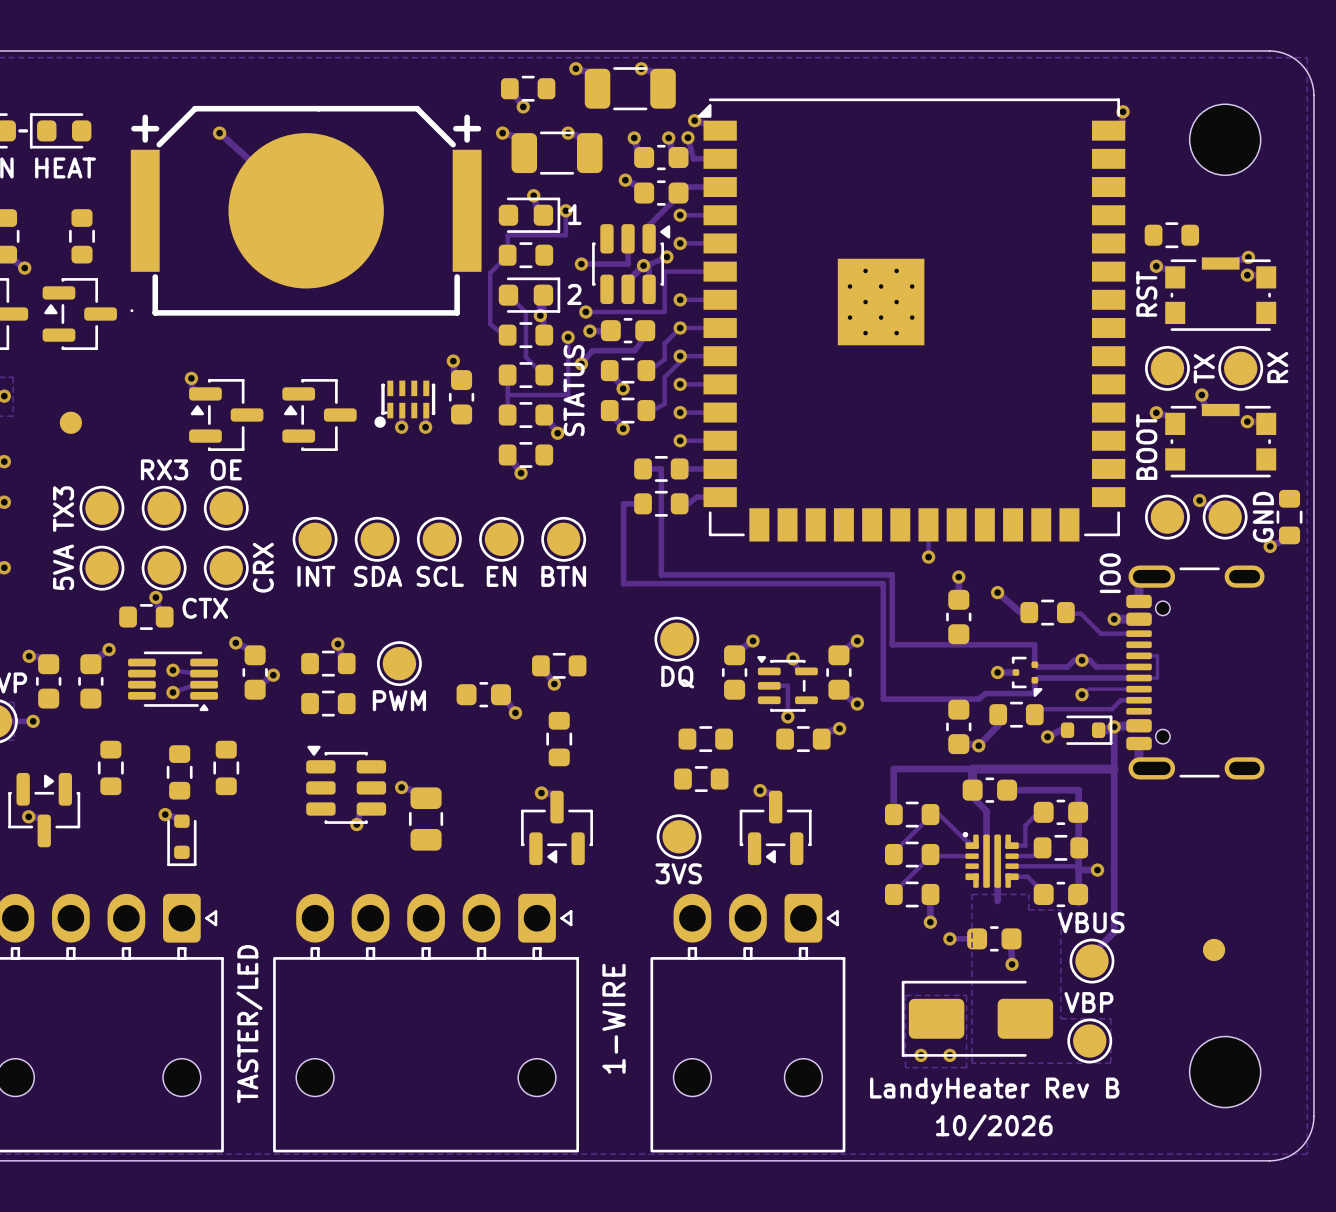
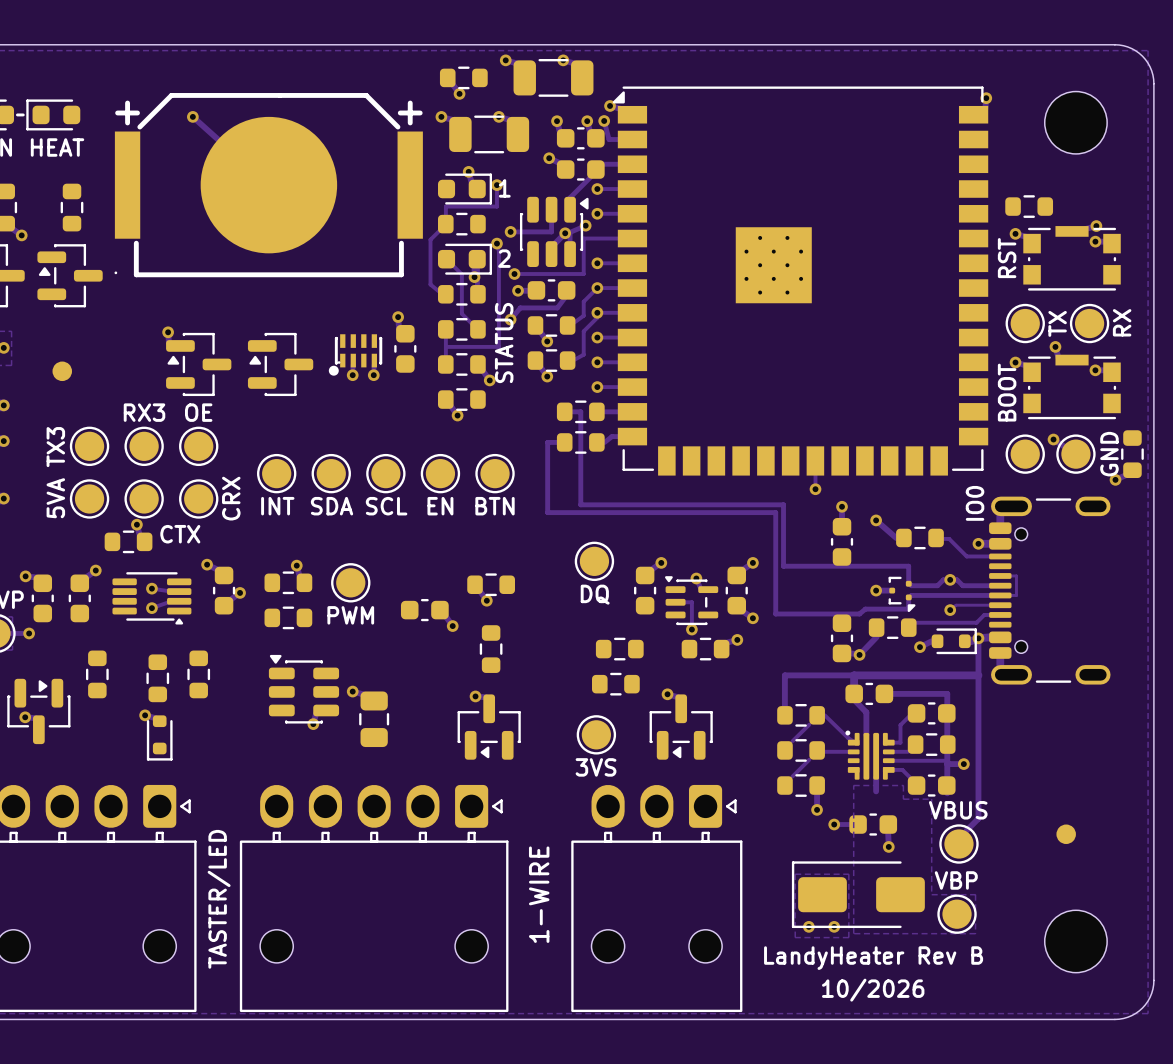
track: none -> (496, 243) (498, 251) (498, 296)
via position: (568, 337) -> (496, 243)

